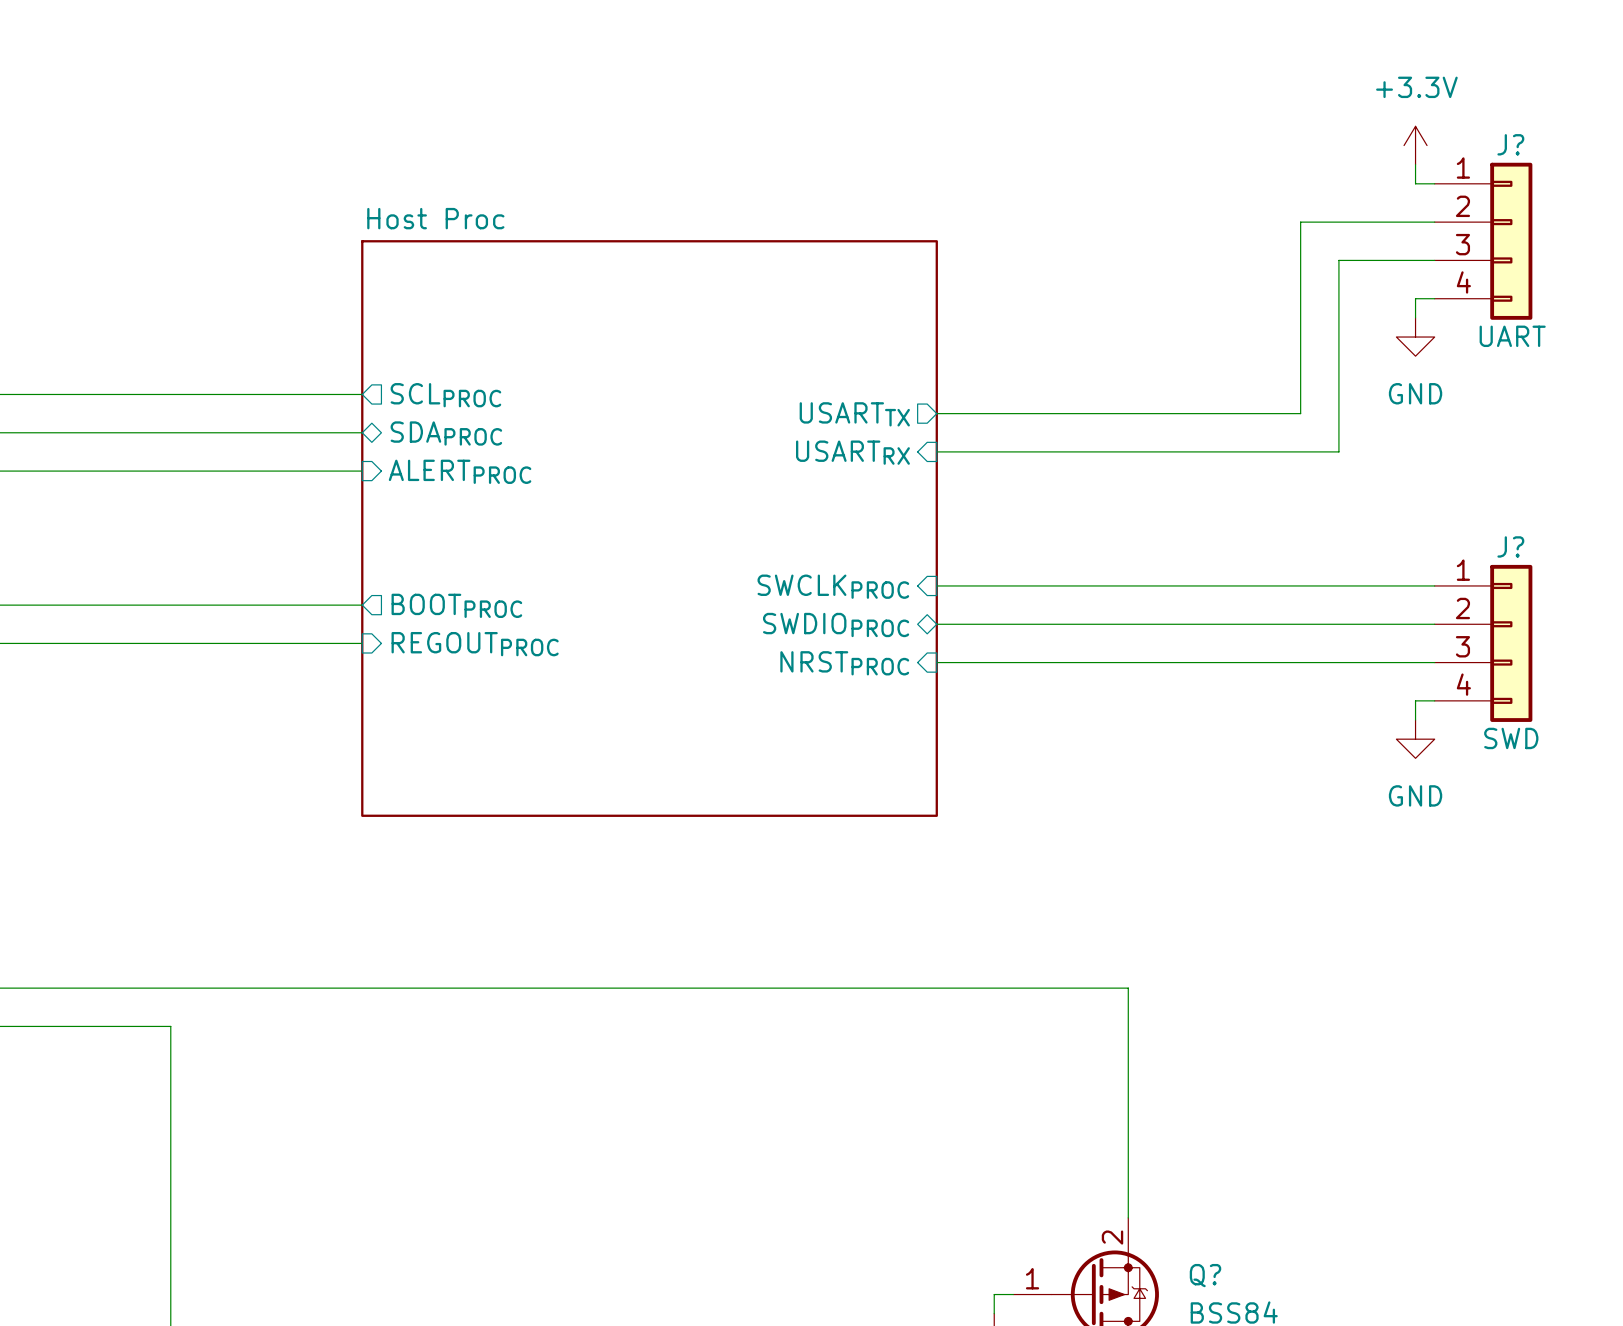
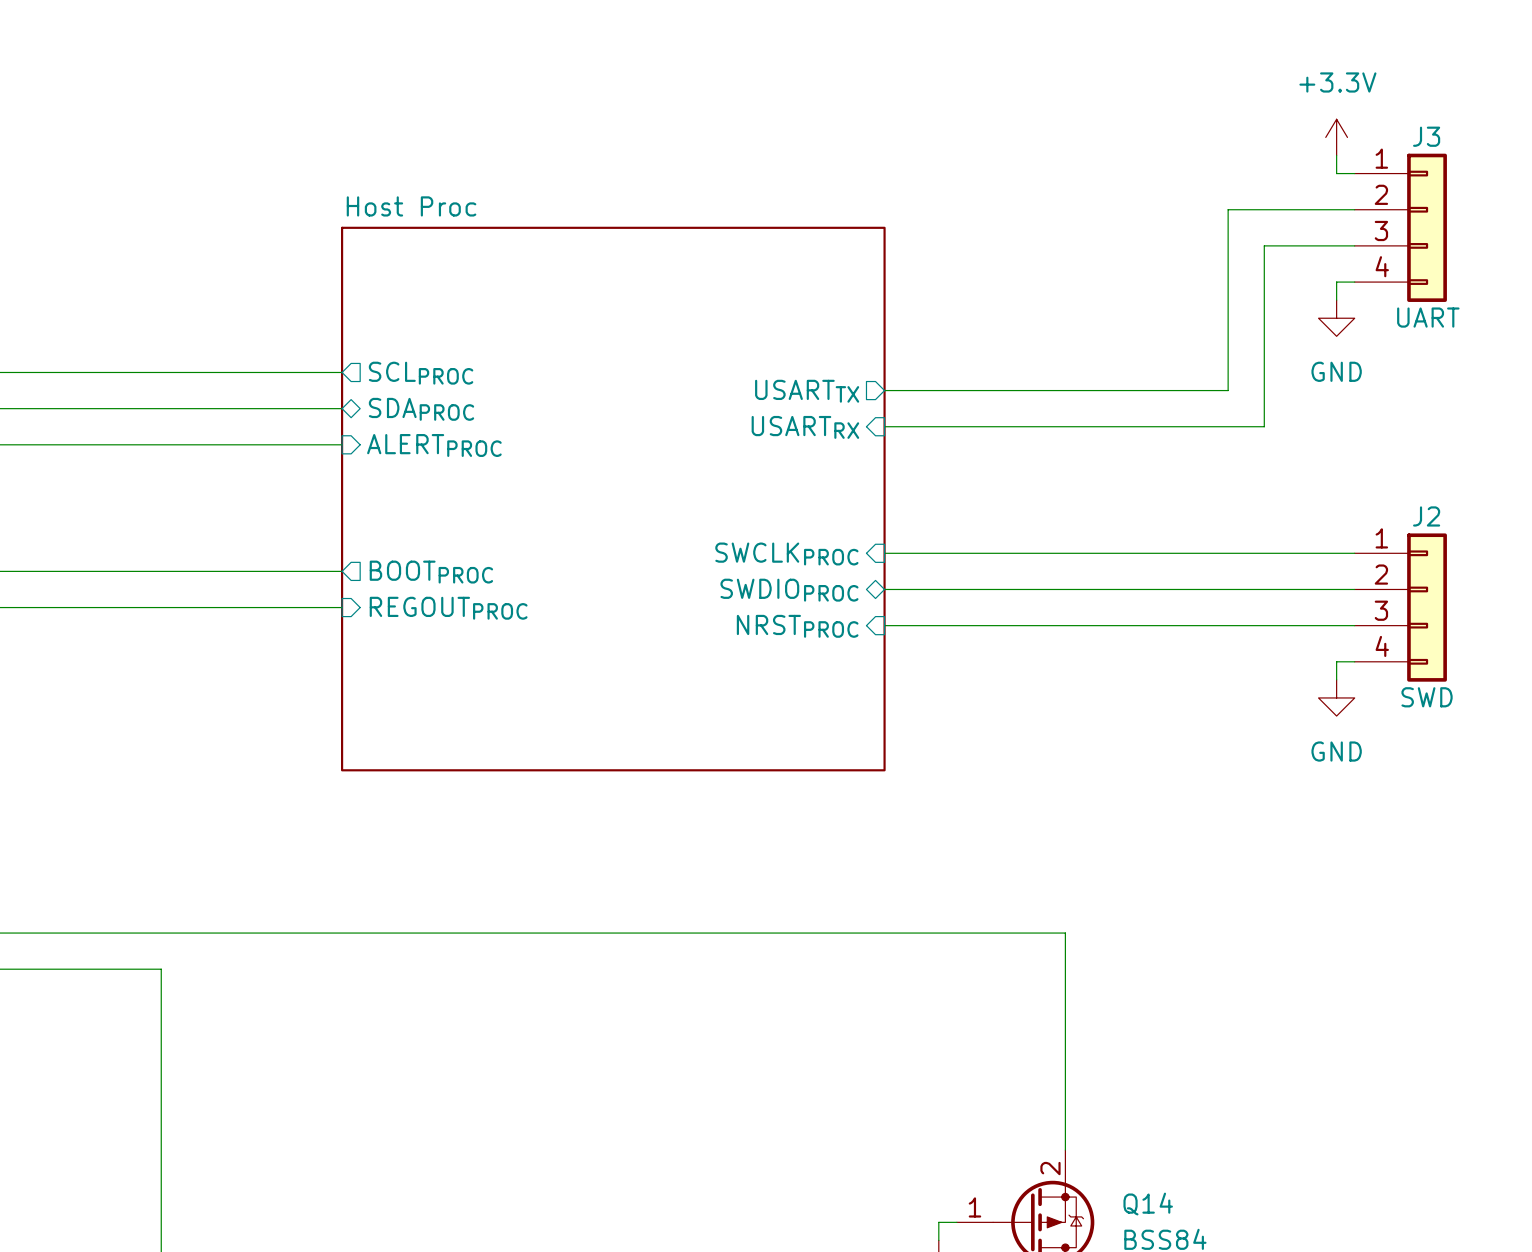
J? name: J? (1510, 144) -> J3 (1426, 136)
J? name: J? (1510, 546) -> J2 (1426, 516)
Q? name: Q? (1205, 1275) -> Q14 (1148, 1204)

